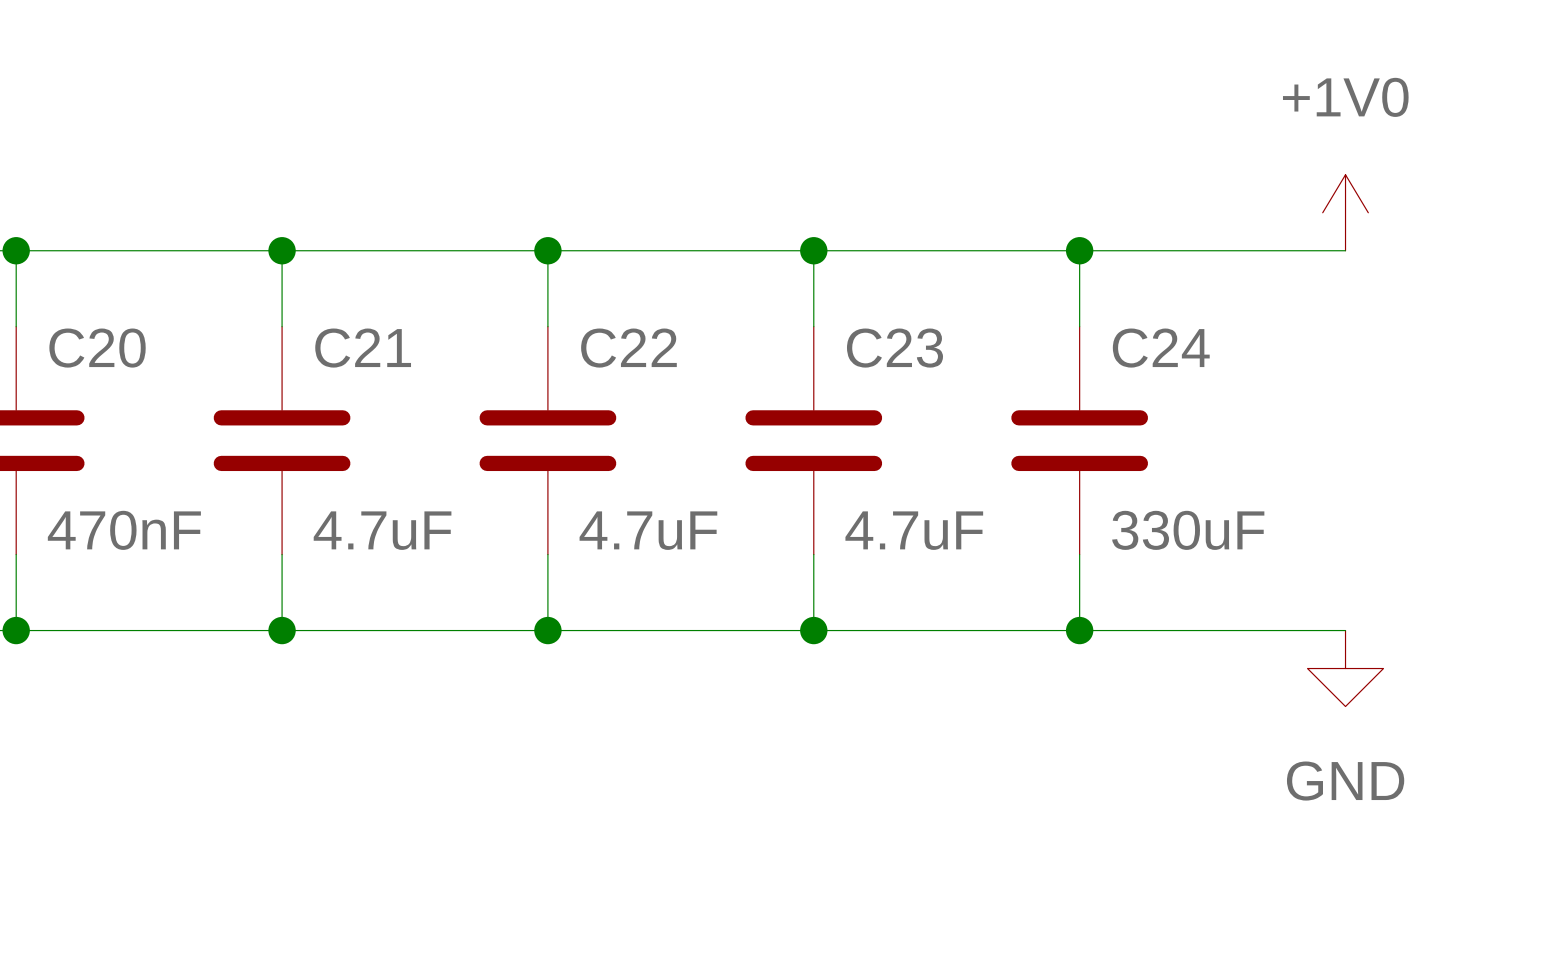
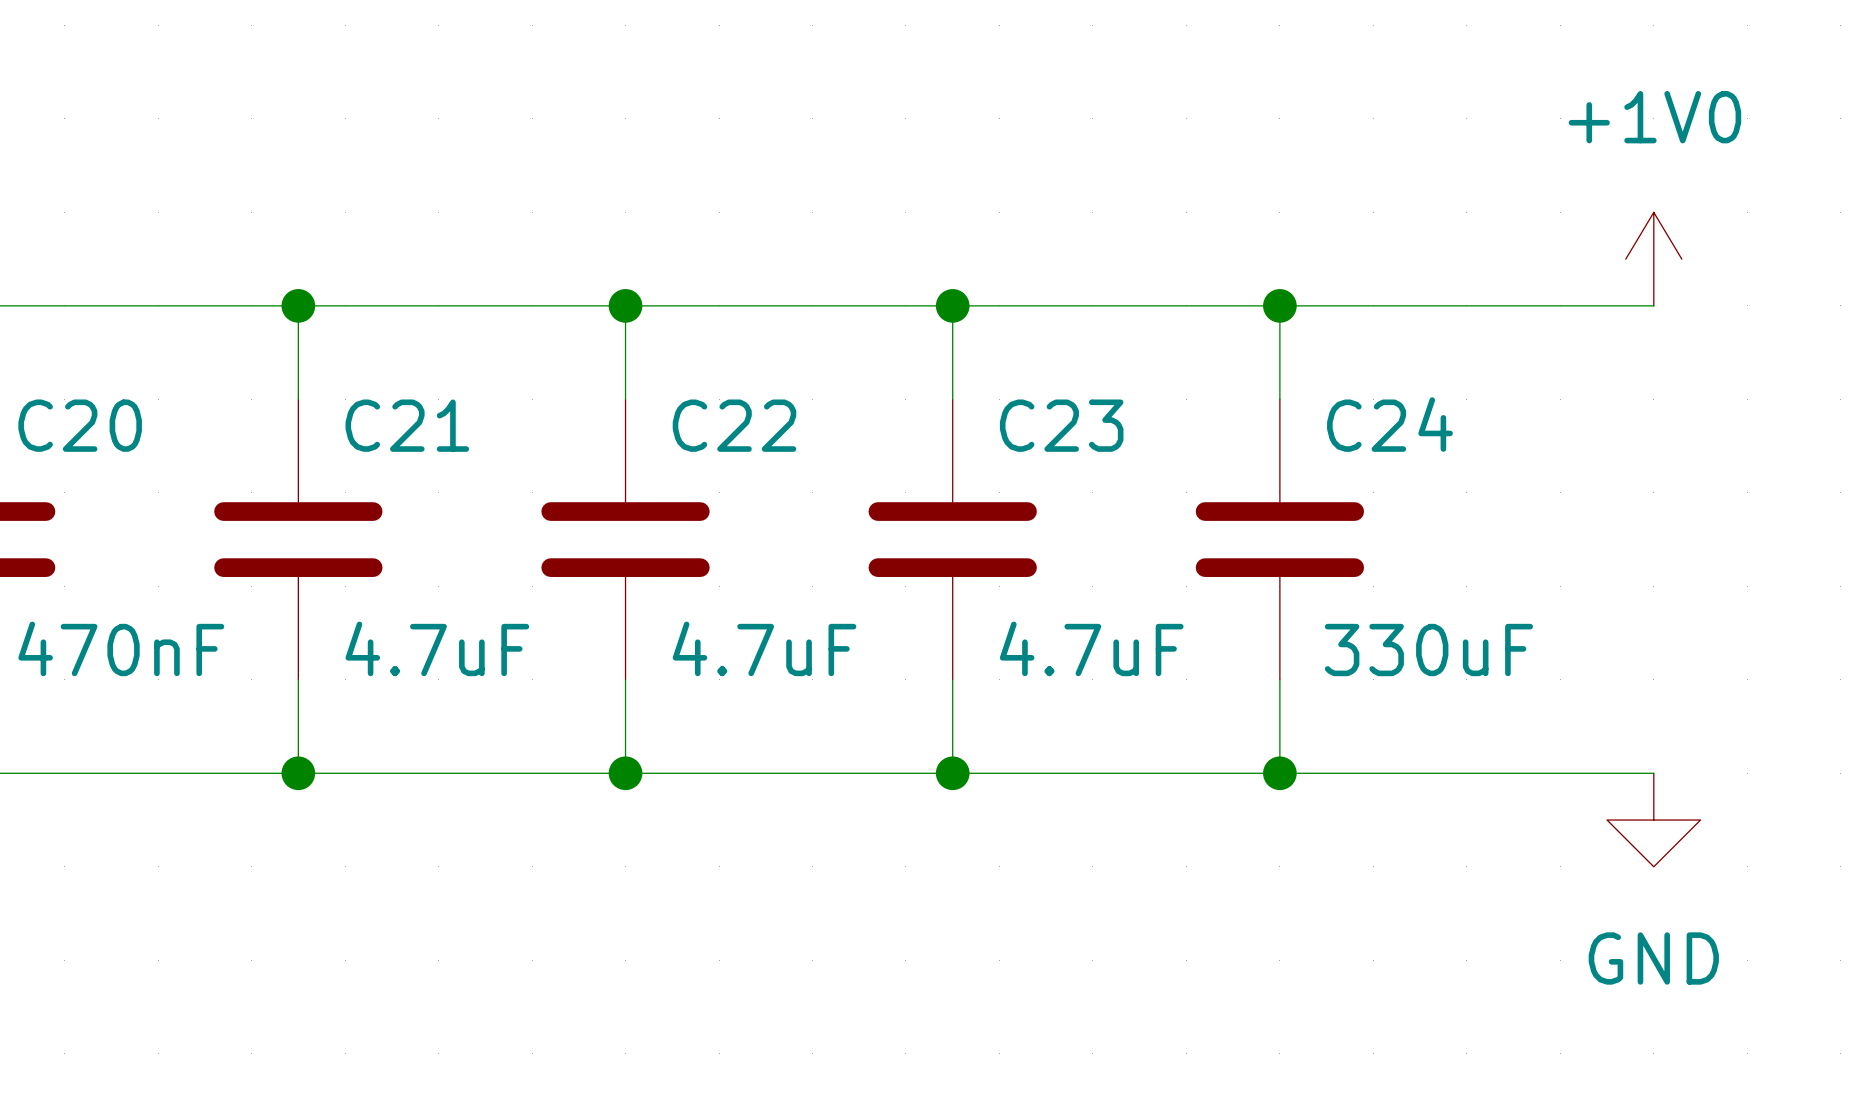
power symbol position: +1V0 (1345, 212) -> +1V0 (1653, 259)
wire: none -> (1607, 305) (1653, 305)
wire: none -> (1607, 773) (1653, 773)
power symbol position: GND (1345, 668) -> GND (1653, 820)

